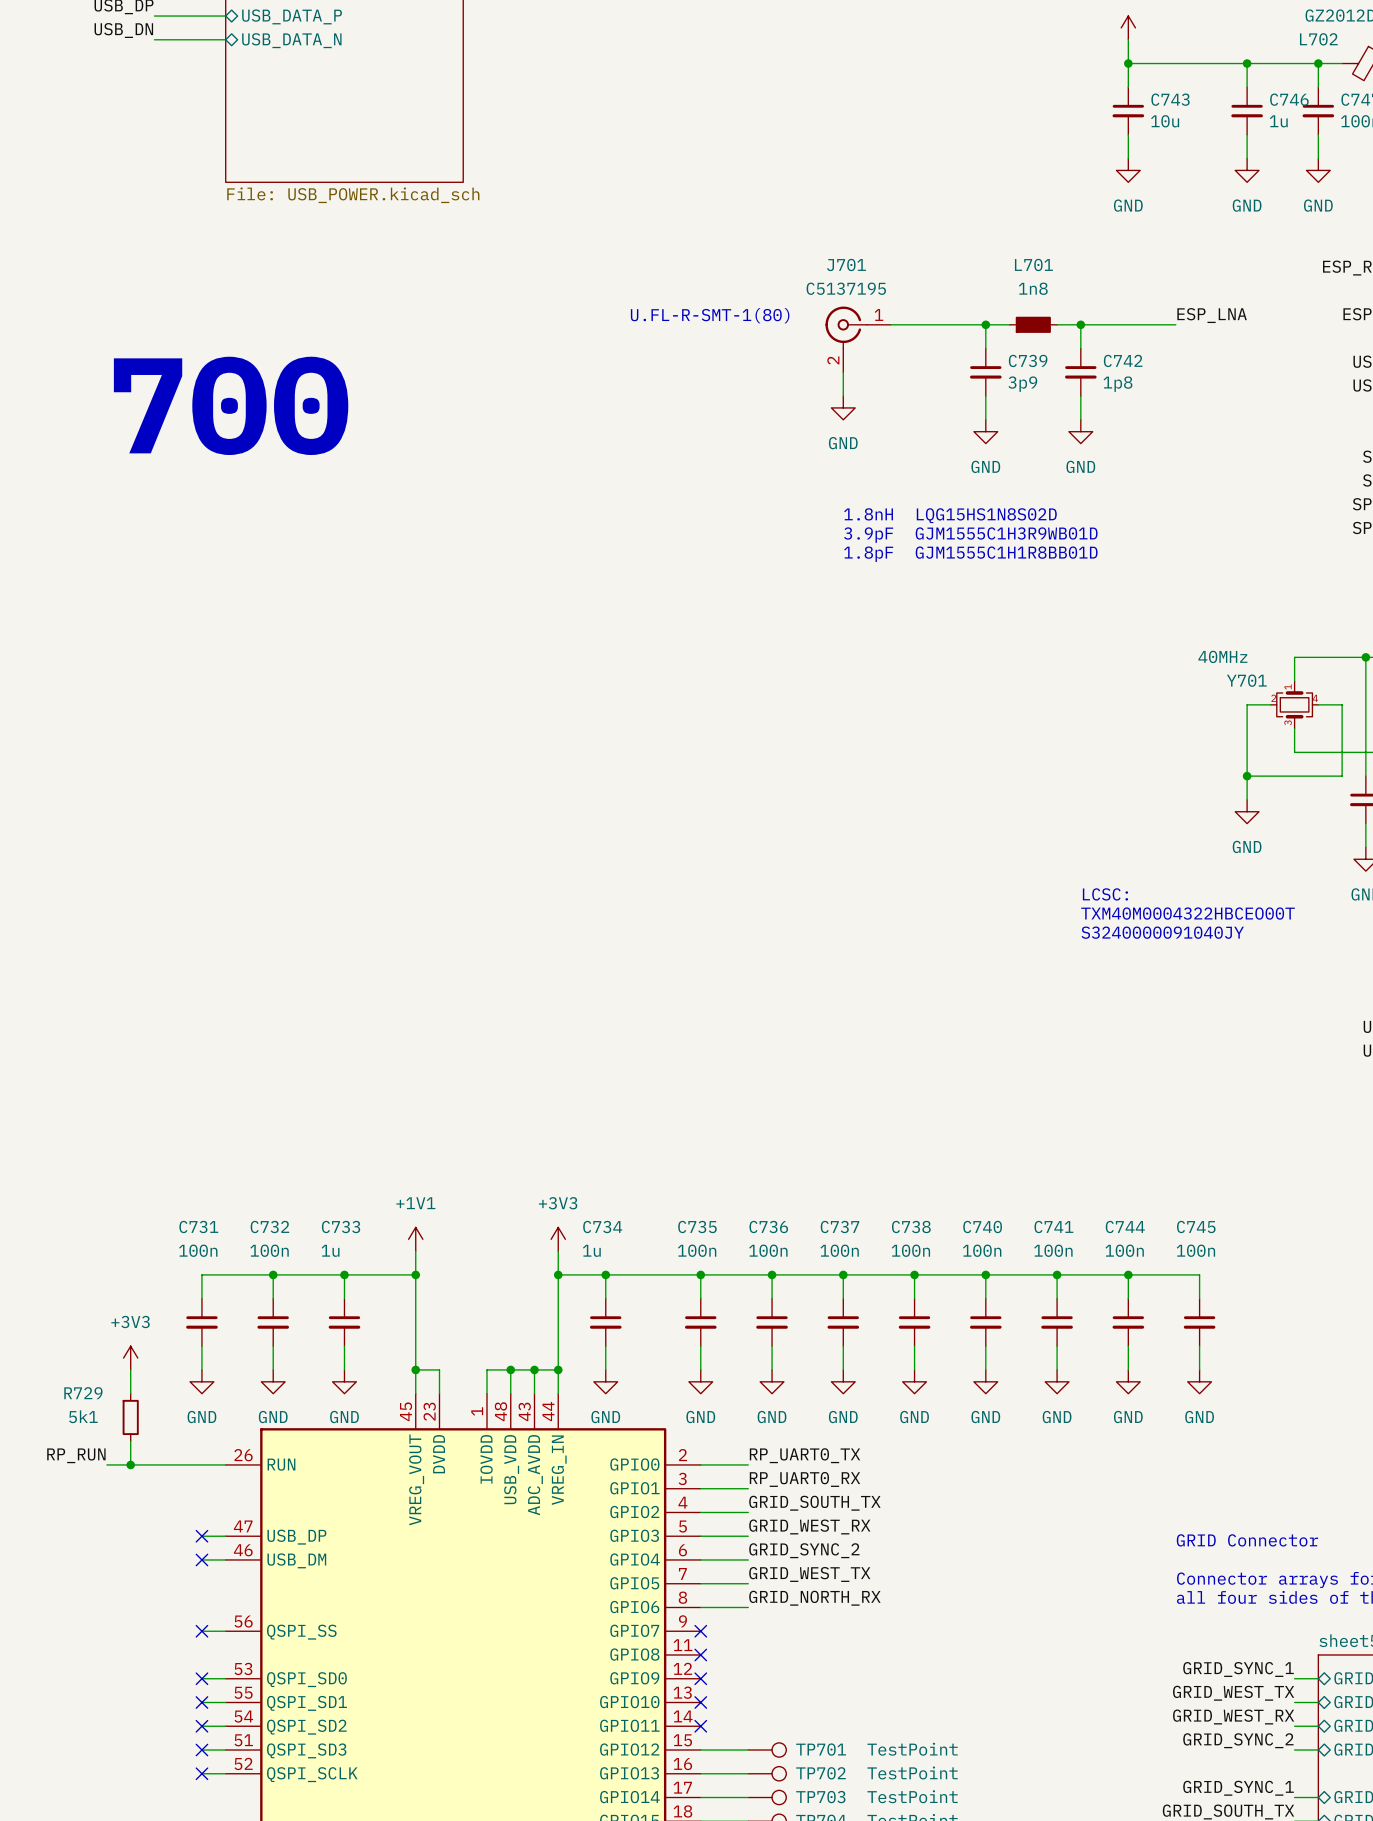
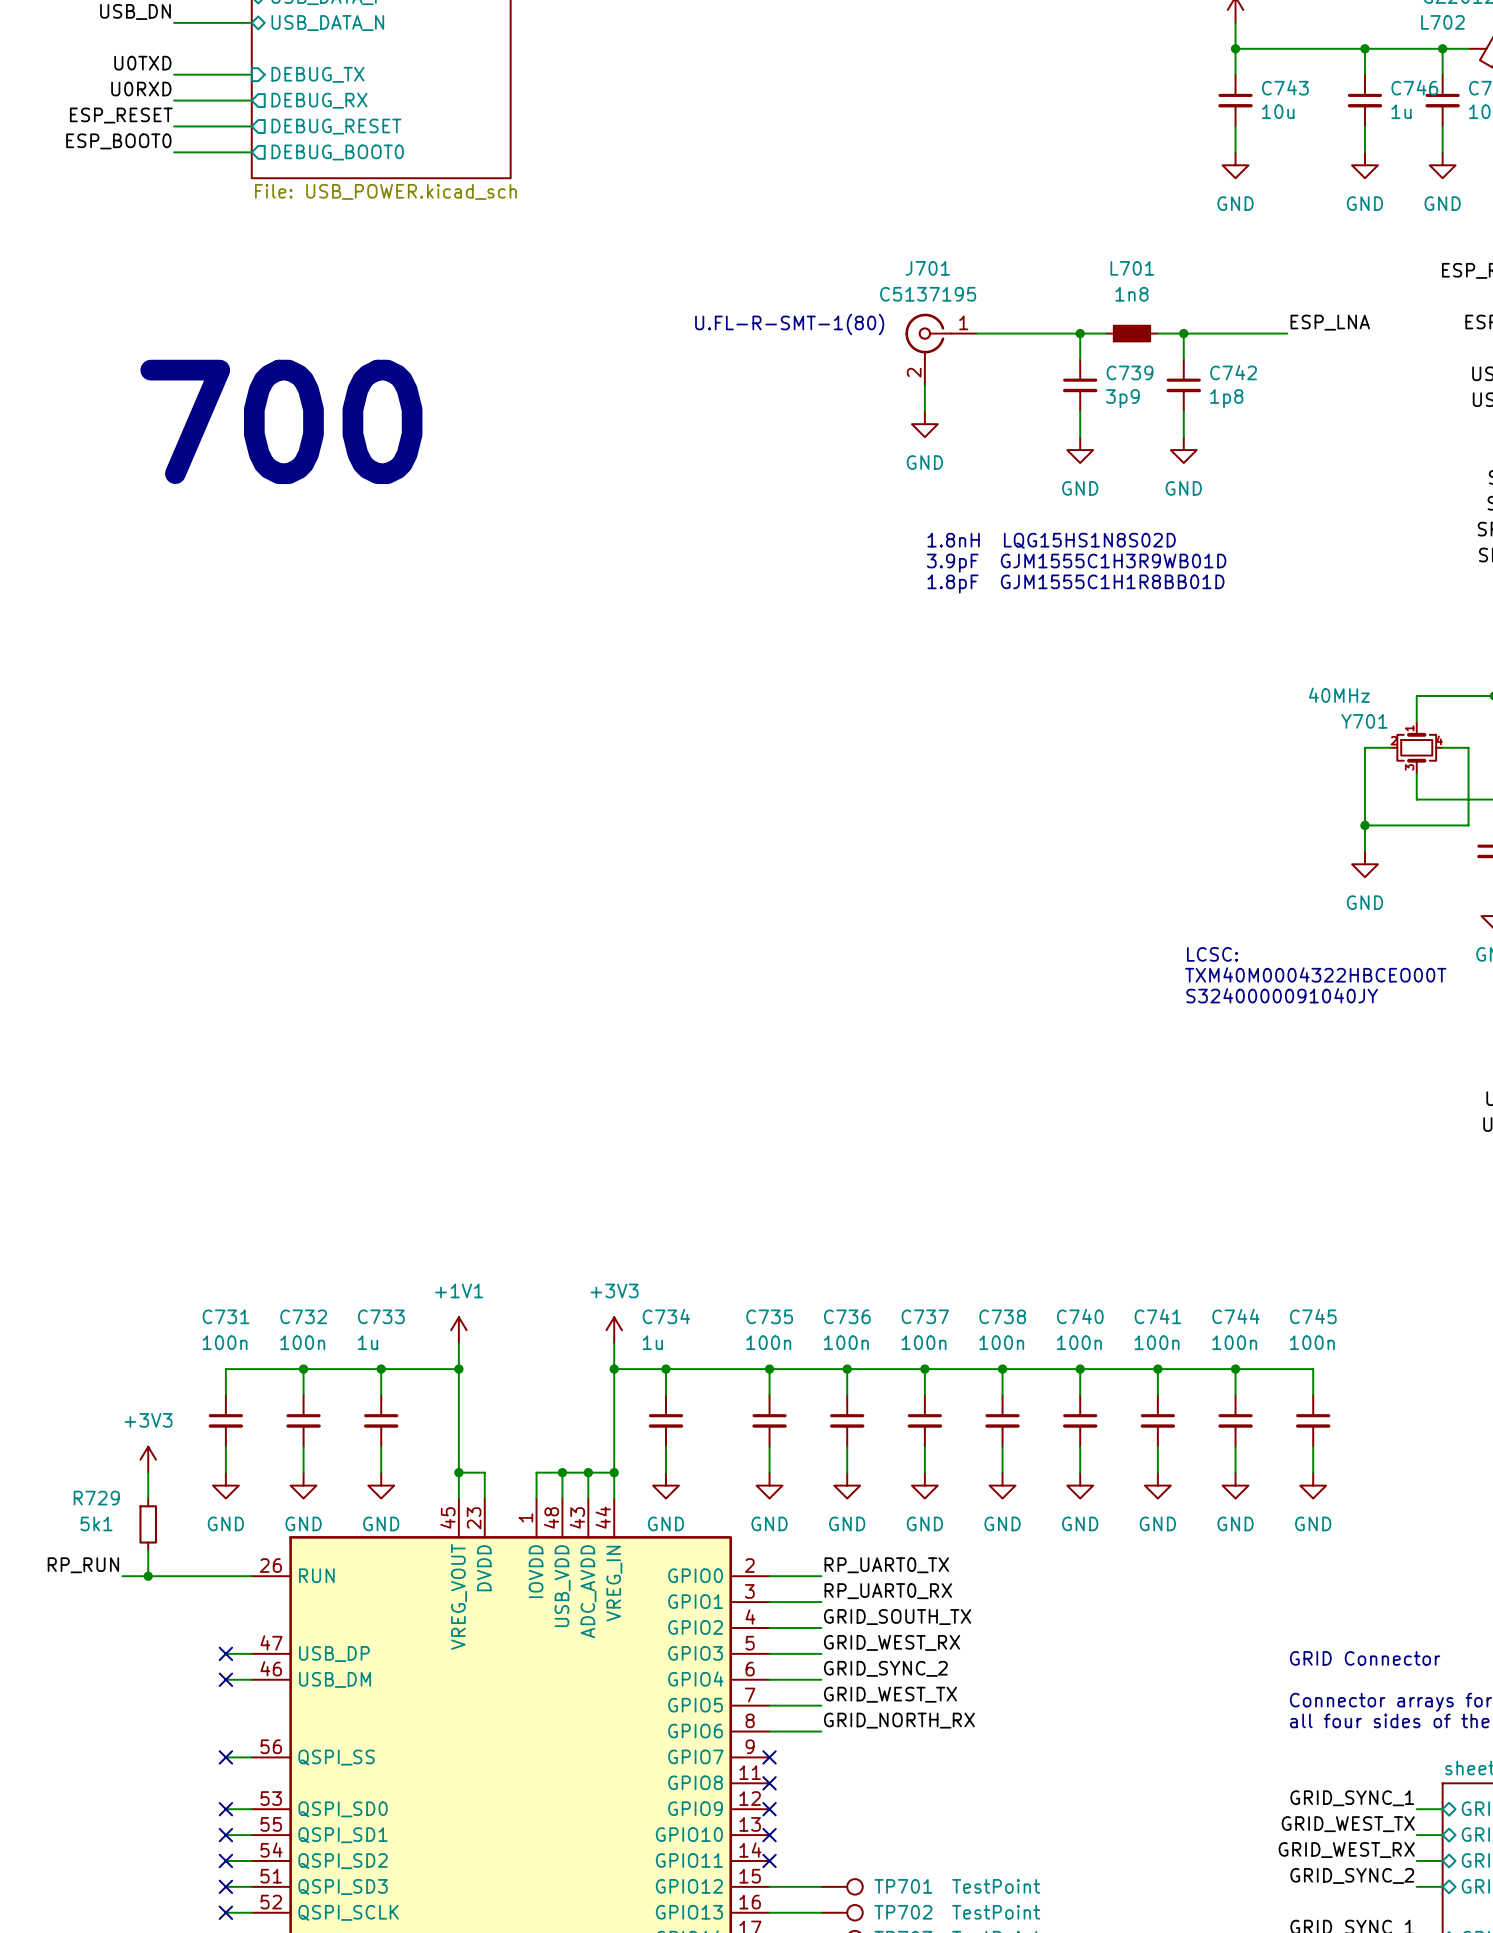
label: none -> U0TXD (142, 63)
wire: none -> (174, 74) (251, 74)
sheet pin: none -> DEBUG_TX (317, 74)
label: none -> U0RXD (141, 89)
wire: none -> (174, 100) (251, 100)
sheet pin: none -> DEBUG_RX (319, 100)
label: none -> ESP_RESET (121, 115)
wire: none -> (174, 126) (251, 126)
sheet pin: none -> DEBUG_RESET (336, 126)
label: none -> ESP_BOOT0 (118, 141)
wire: none -> (174, 152) (251, 152)
sheet pin: none -> DEBUG_BOOT0 (337, 152)

